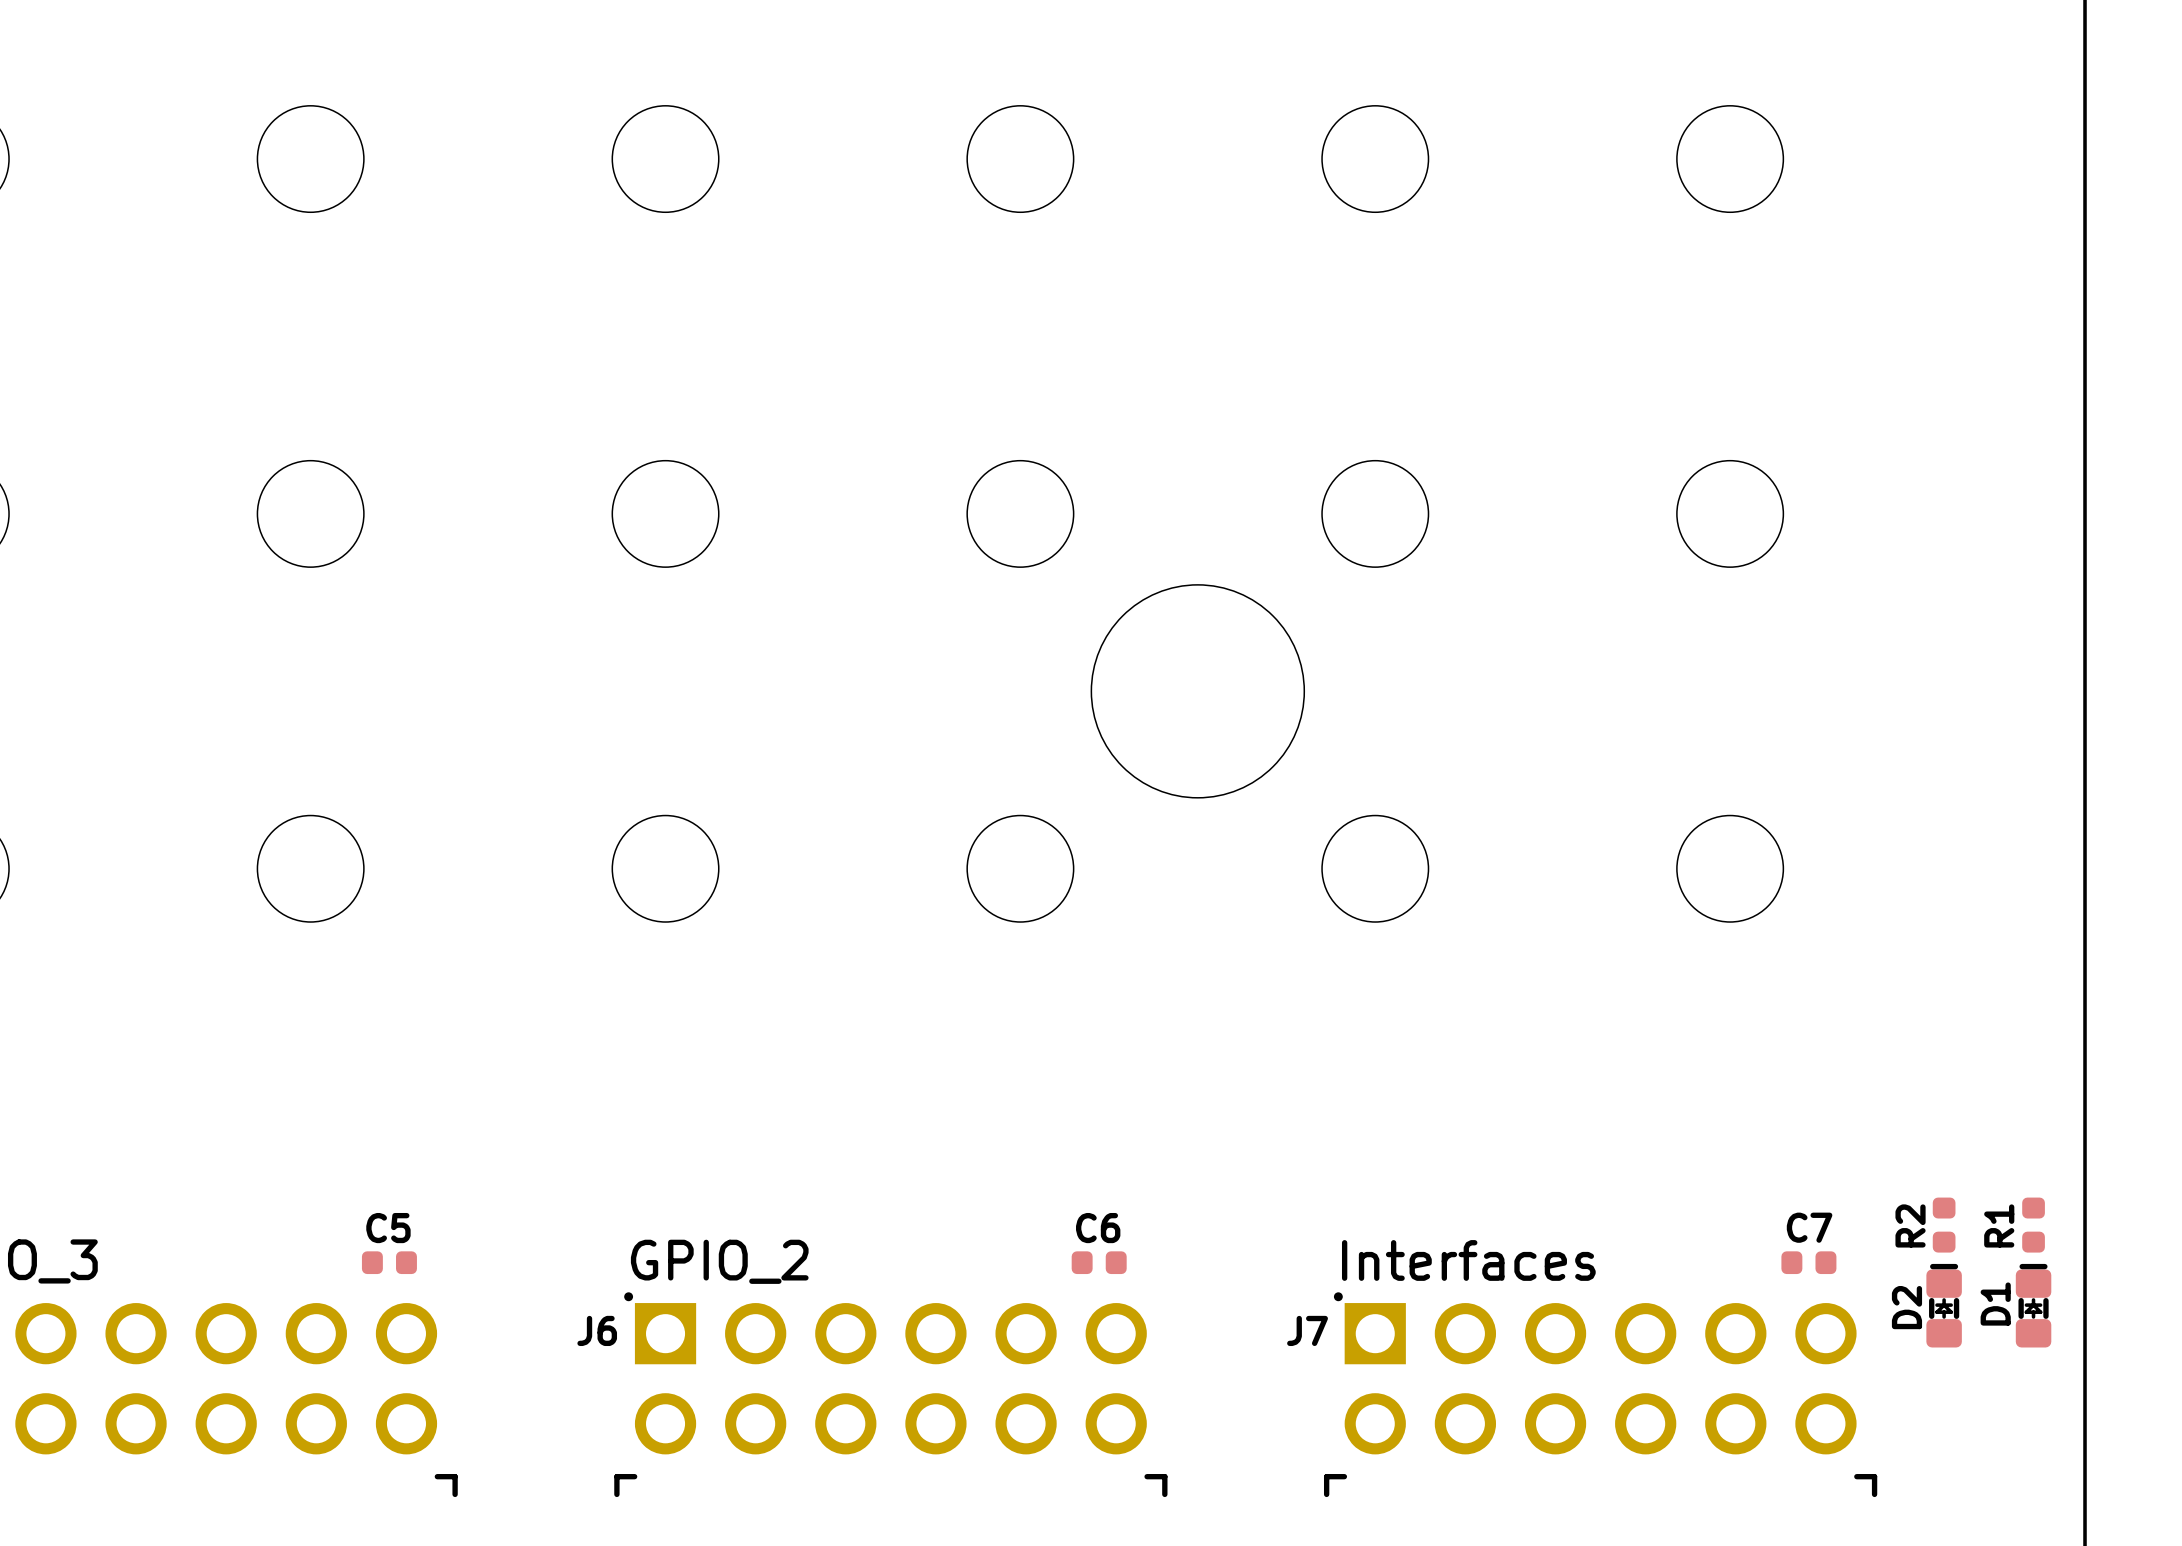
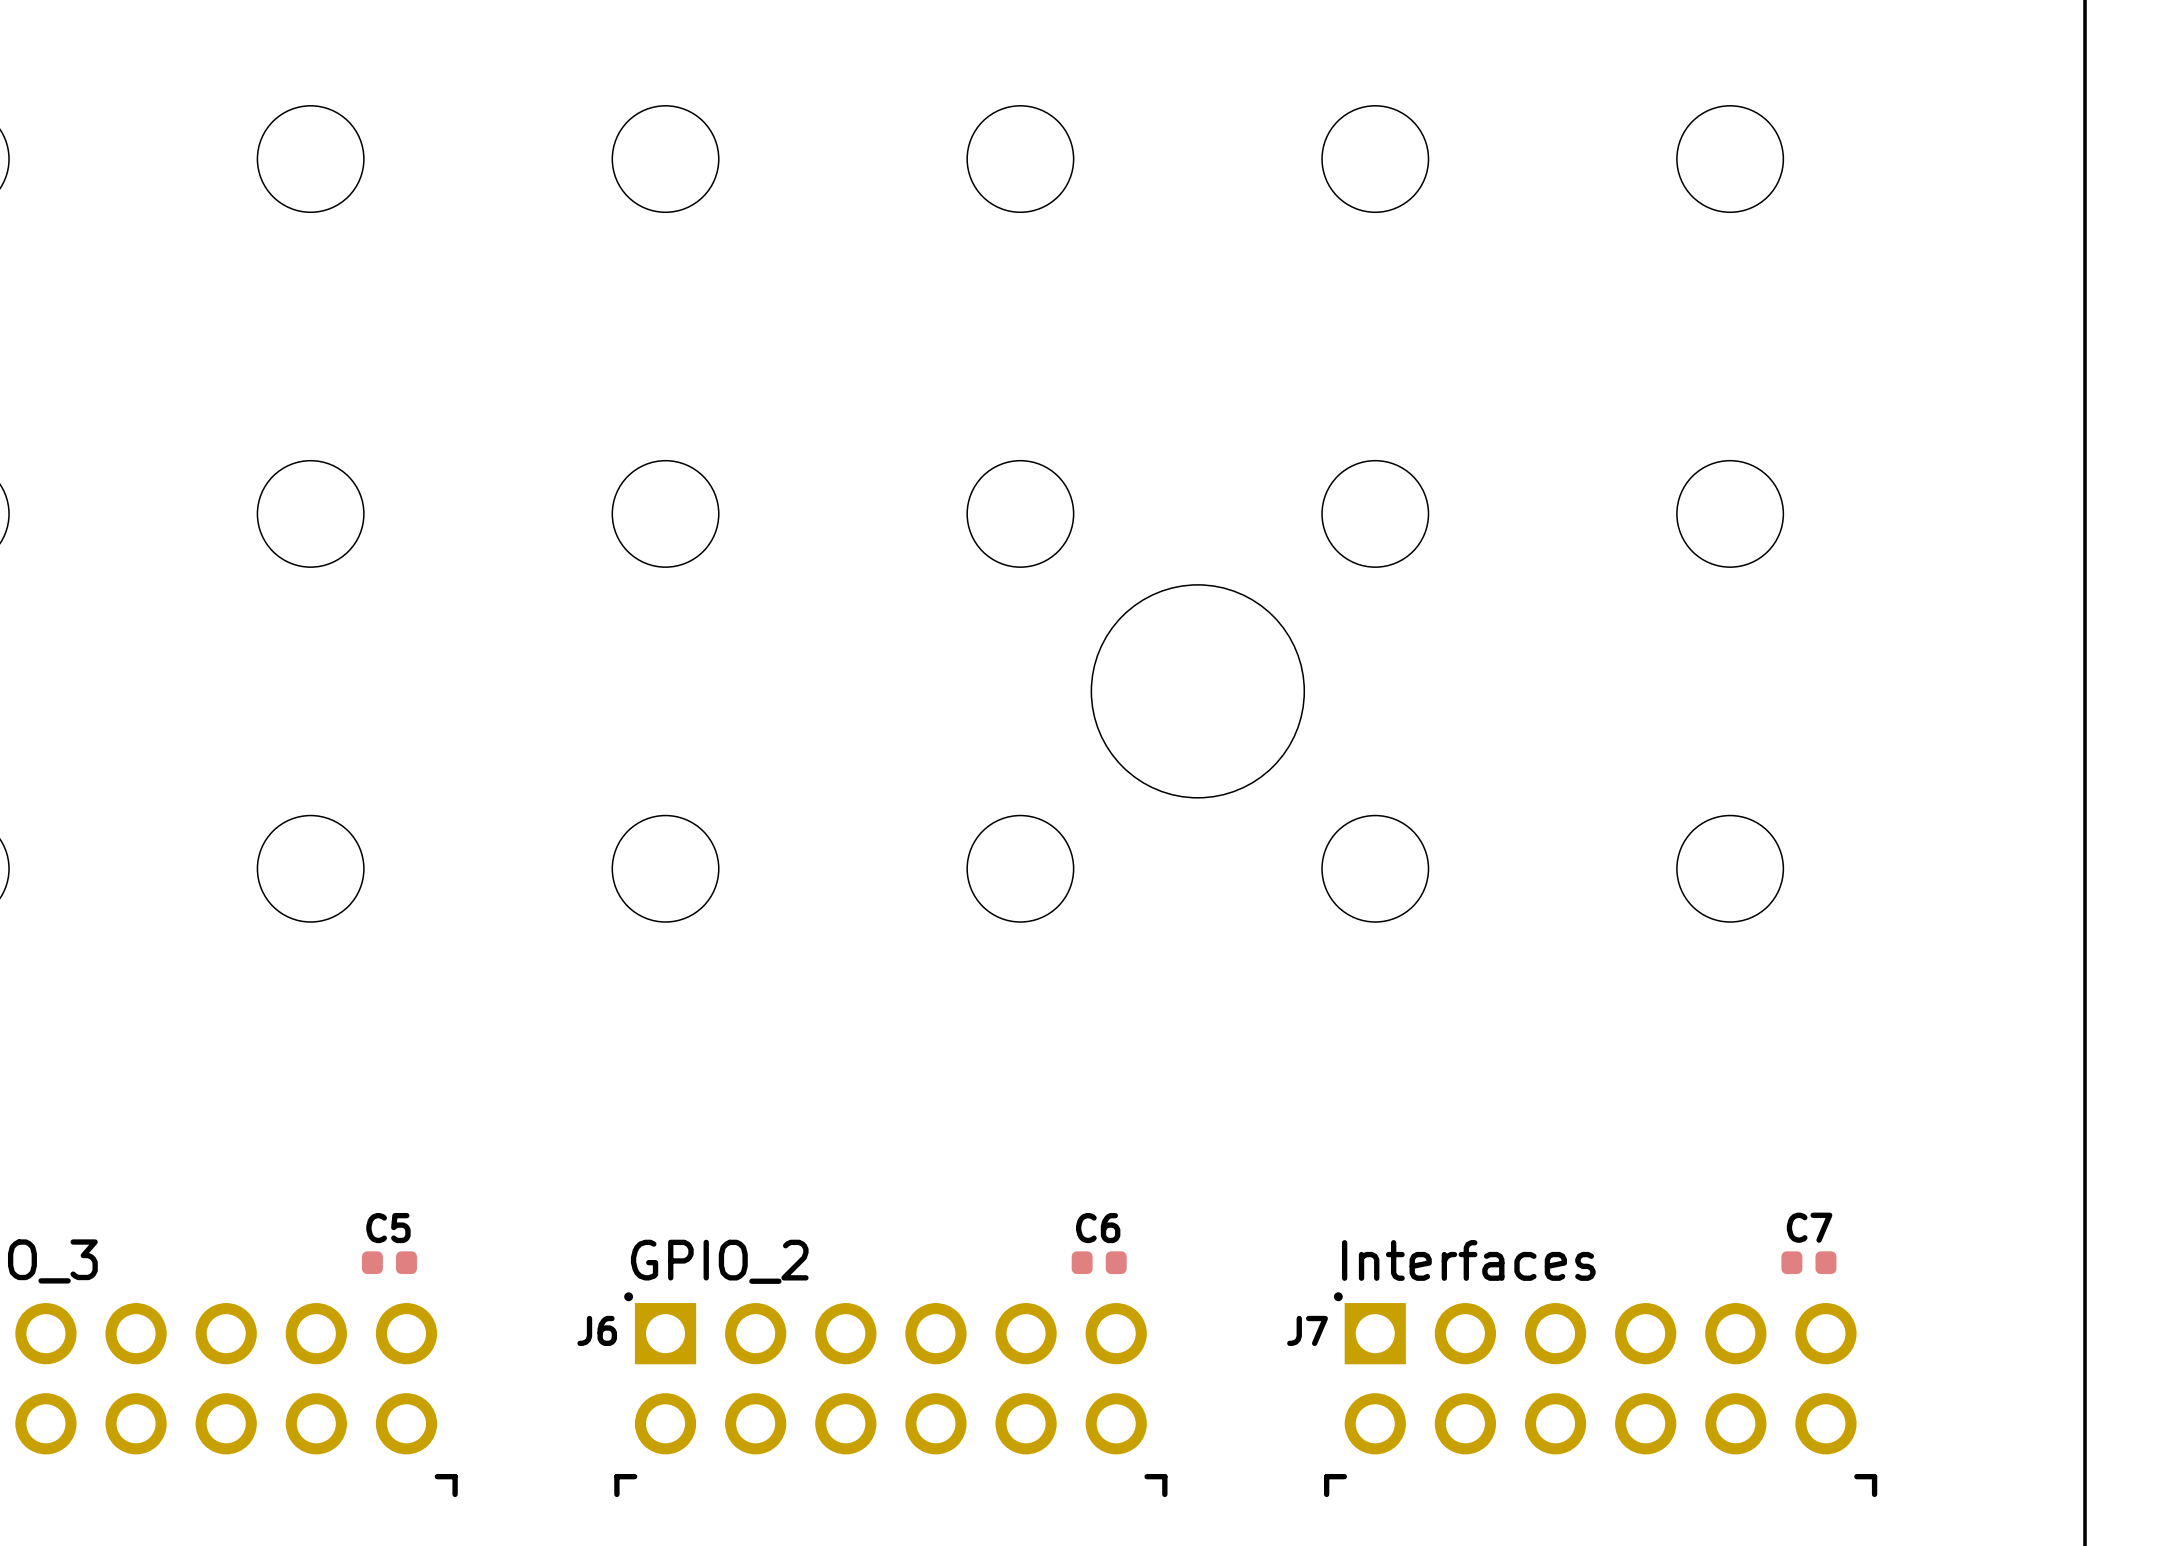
R2: (1944, 1225) -> none
R1: (2033, 1225) -> none
D2: (1944, 1305) -> none
D1: (2033, 1305) -> none

